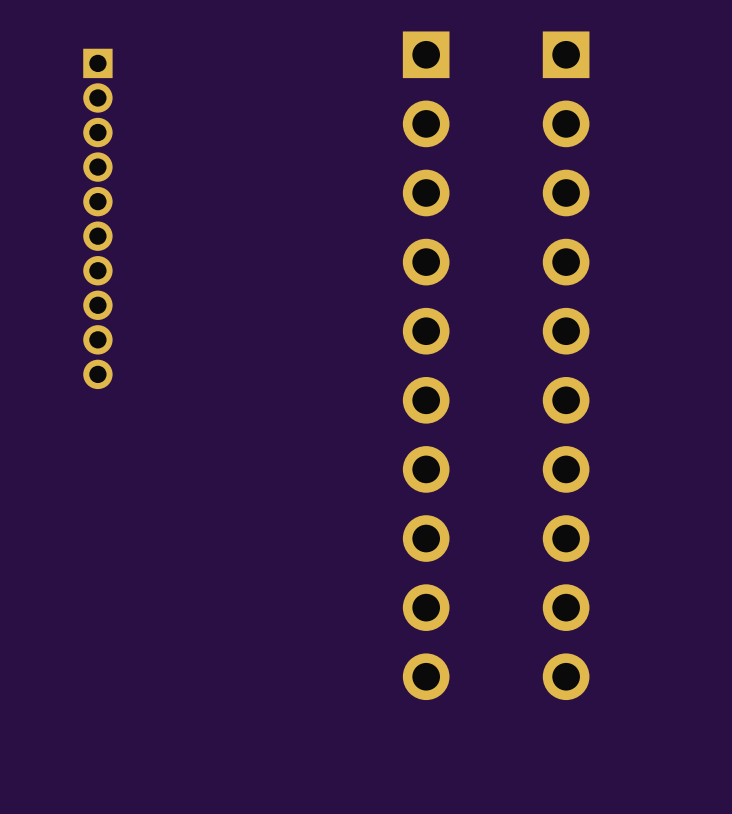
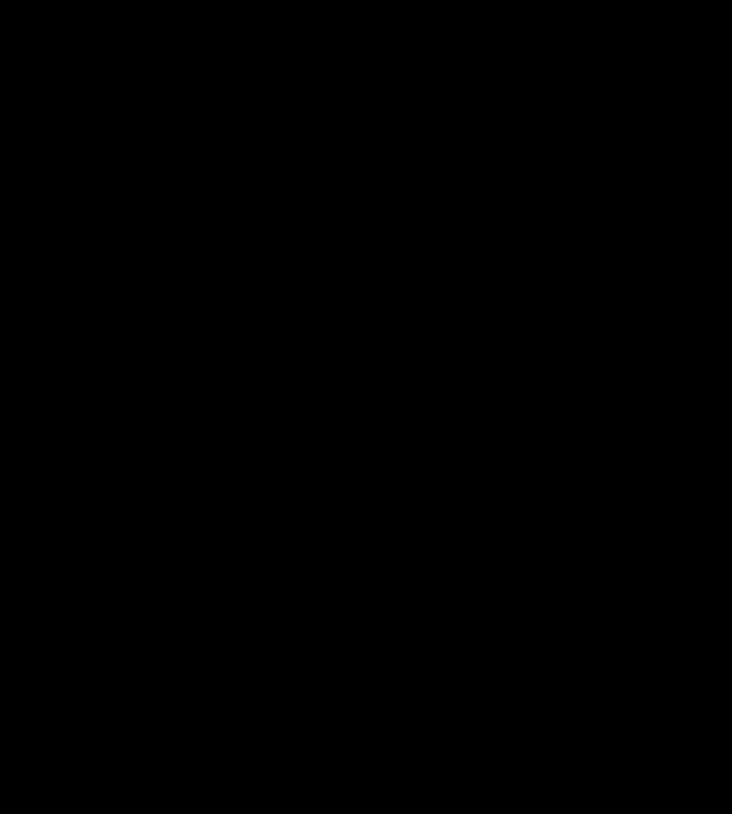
part: (97, 218) -> none
part: (426, 365) -> none
part: (566, 365) -> none

